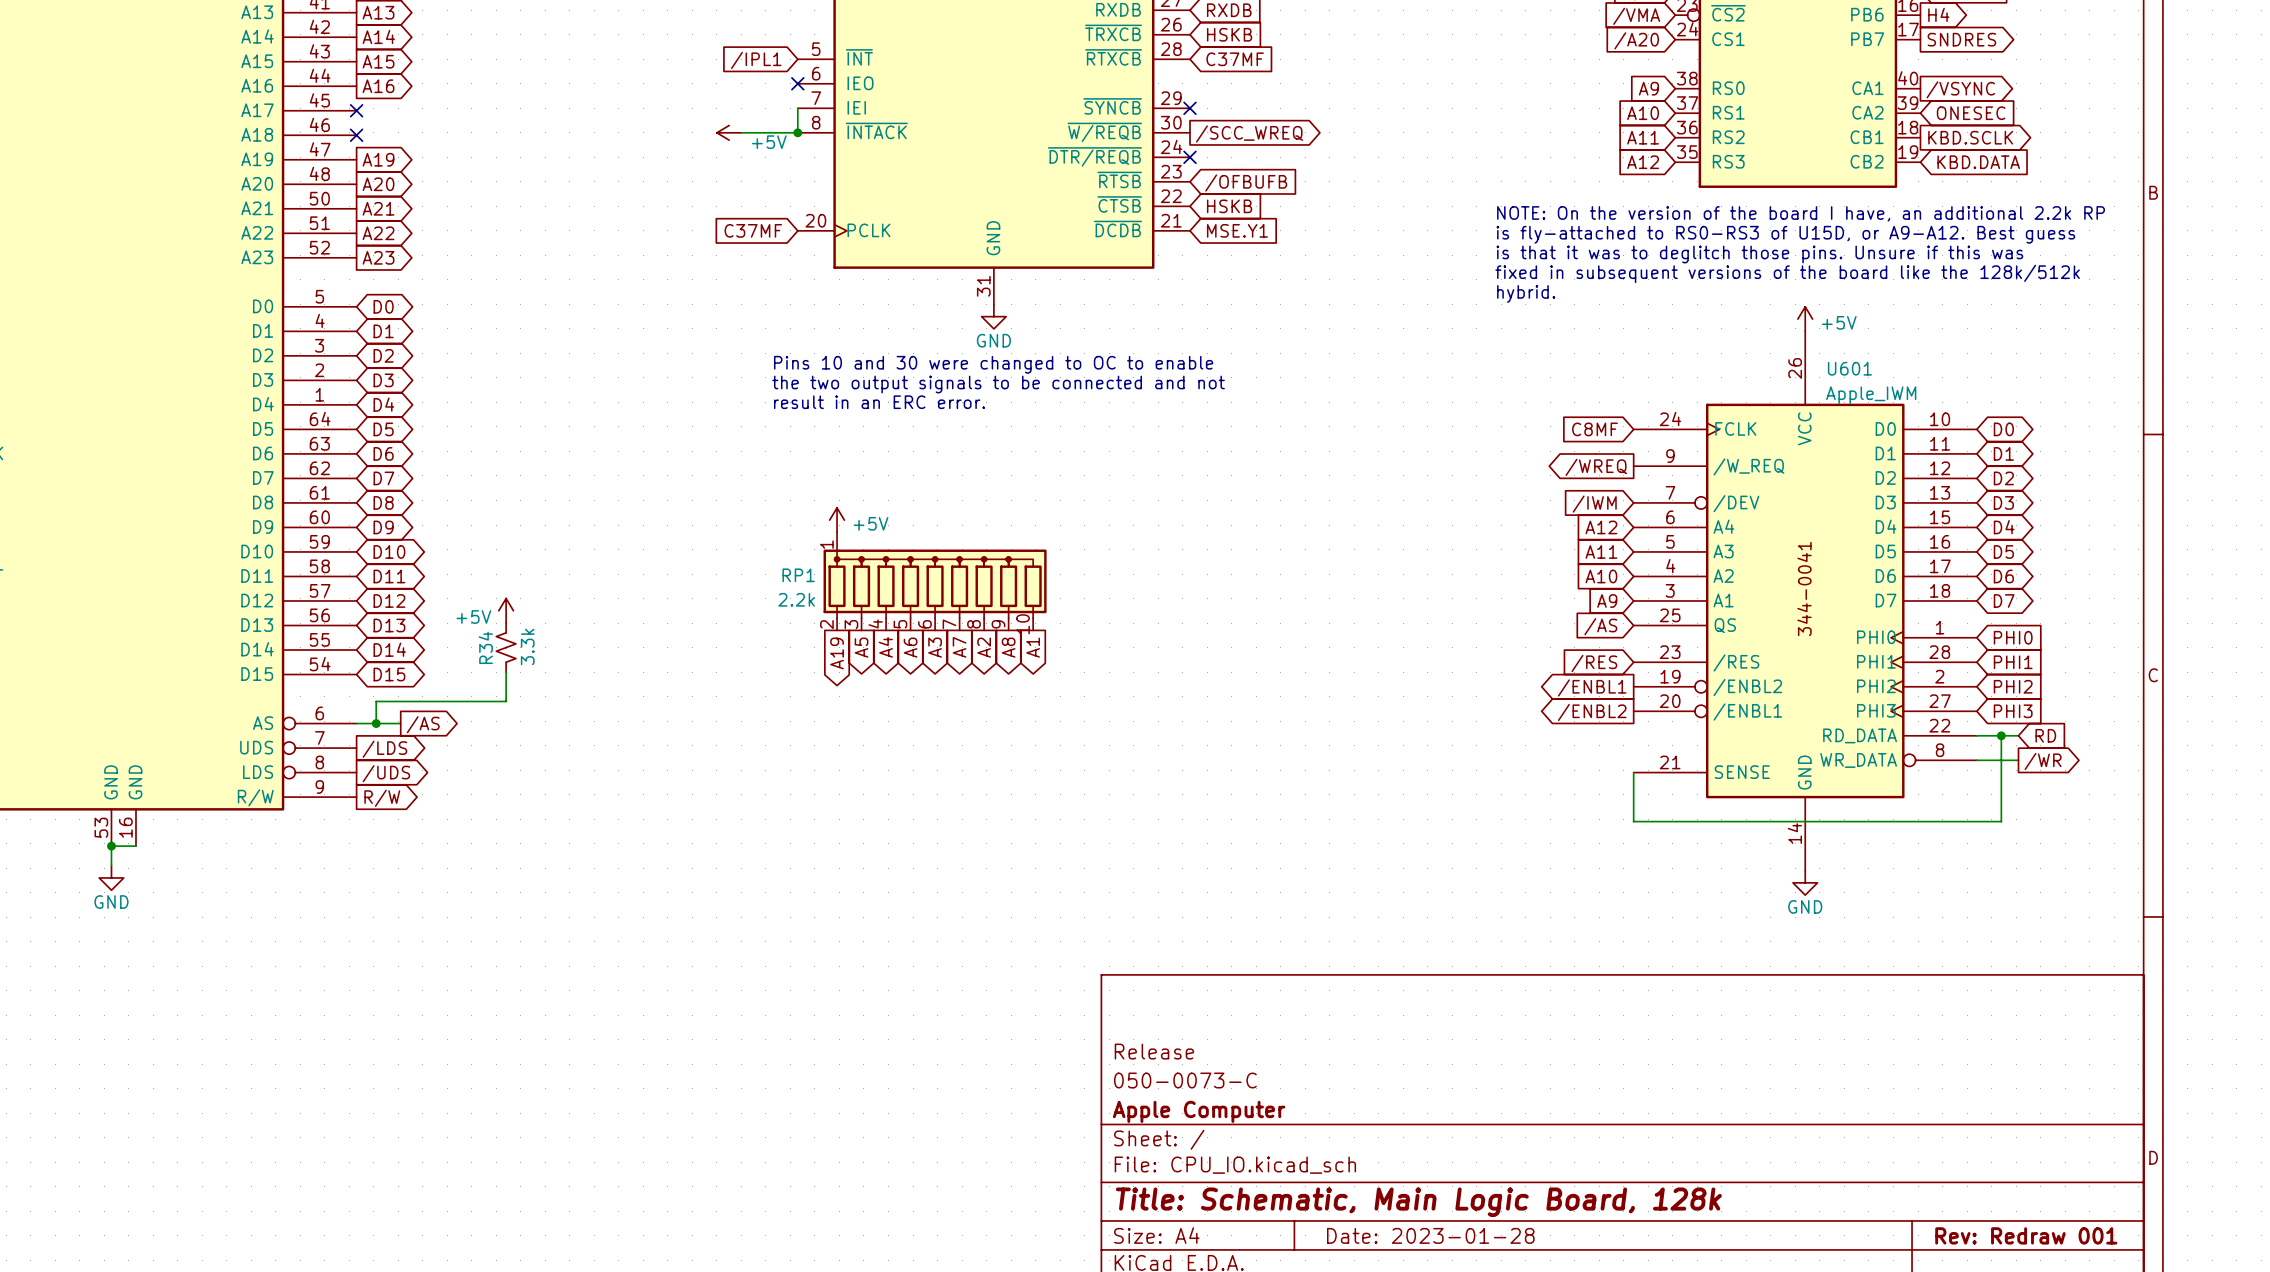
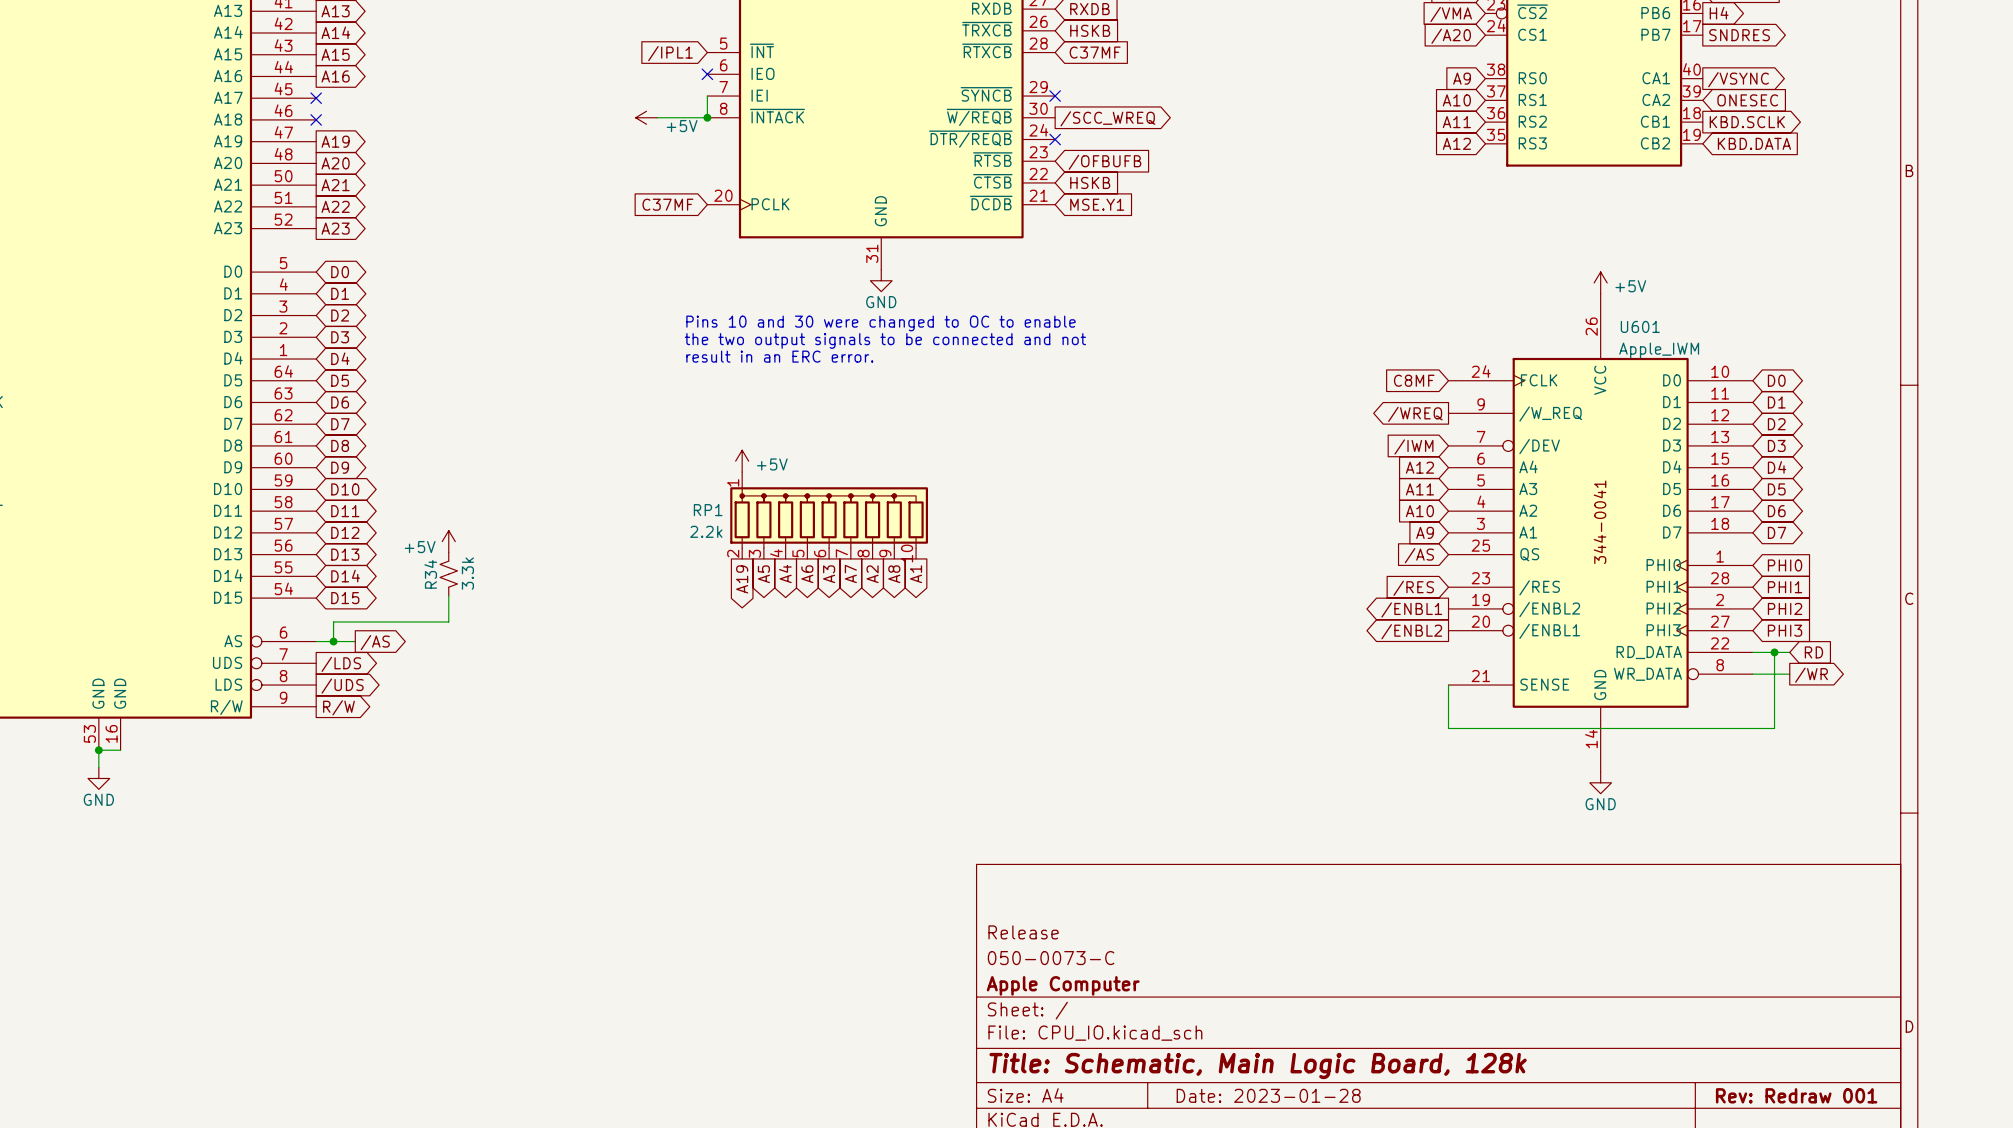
text: NOTE: On the version of the board I have, an additional 2.2k RP (1801, 213) -> none
text: is fly-attached to RS0-RS3 of U15D, or A9-A12. Best guess (1785, 234) -> none
text: is that it was to deglitch those pins. Unsure if this was (1759, 254) -> none
text: fixed in subsequent versions of the board like the 128k/512k (1787, 273) -> none
text: hybrid. (1526, 293) -> none

